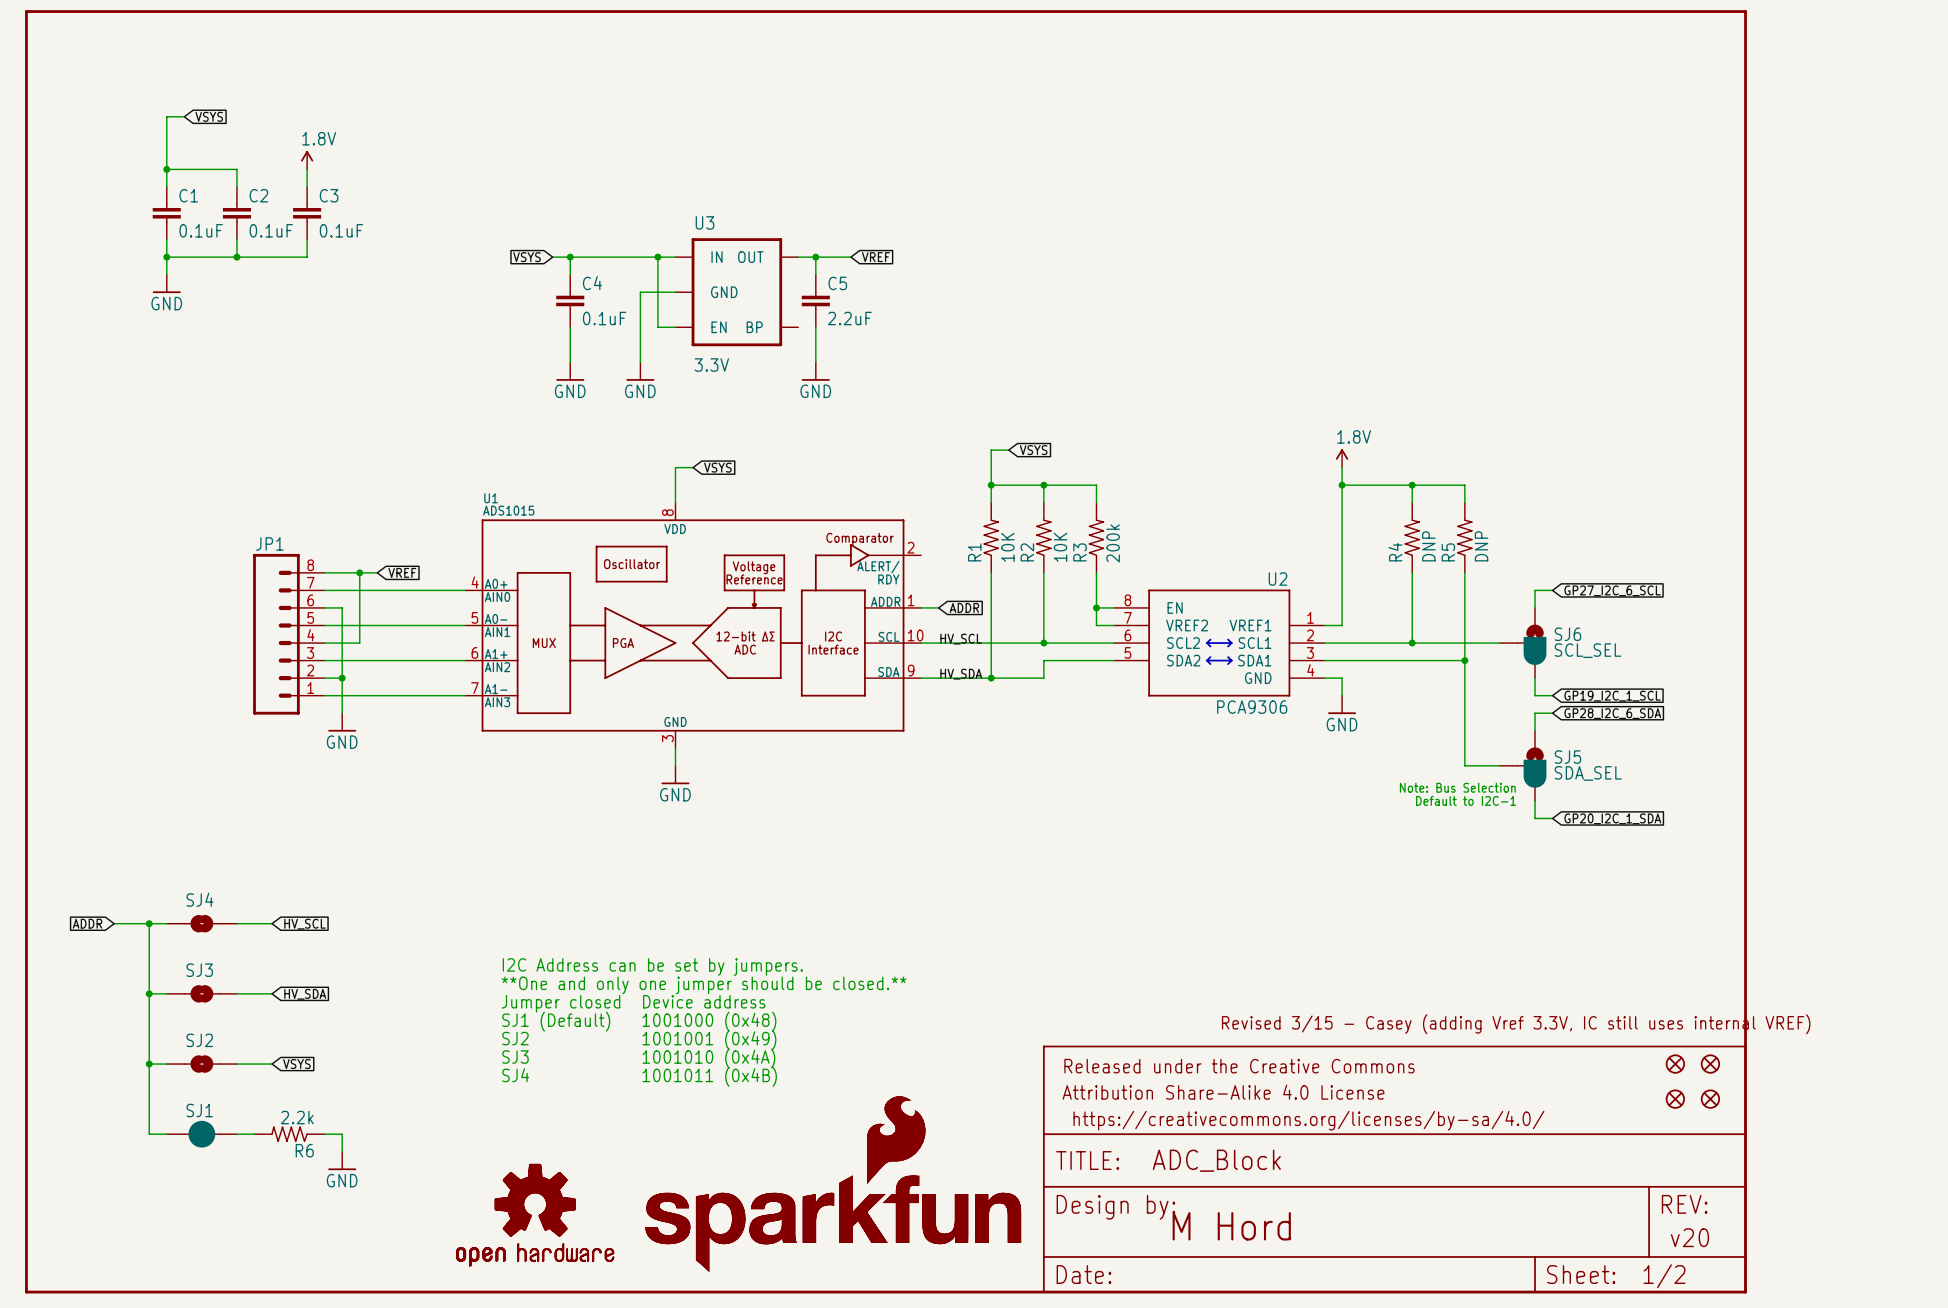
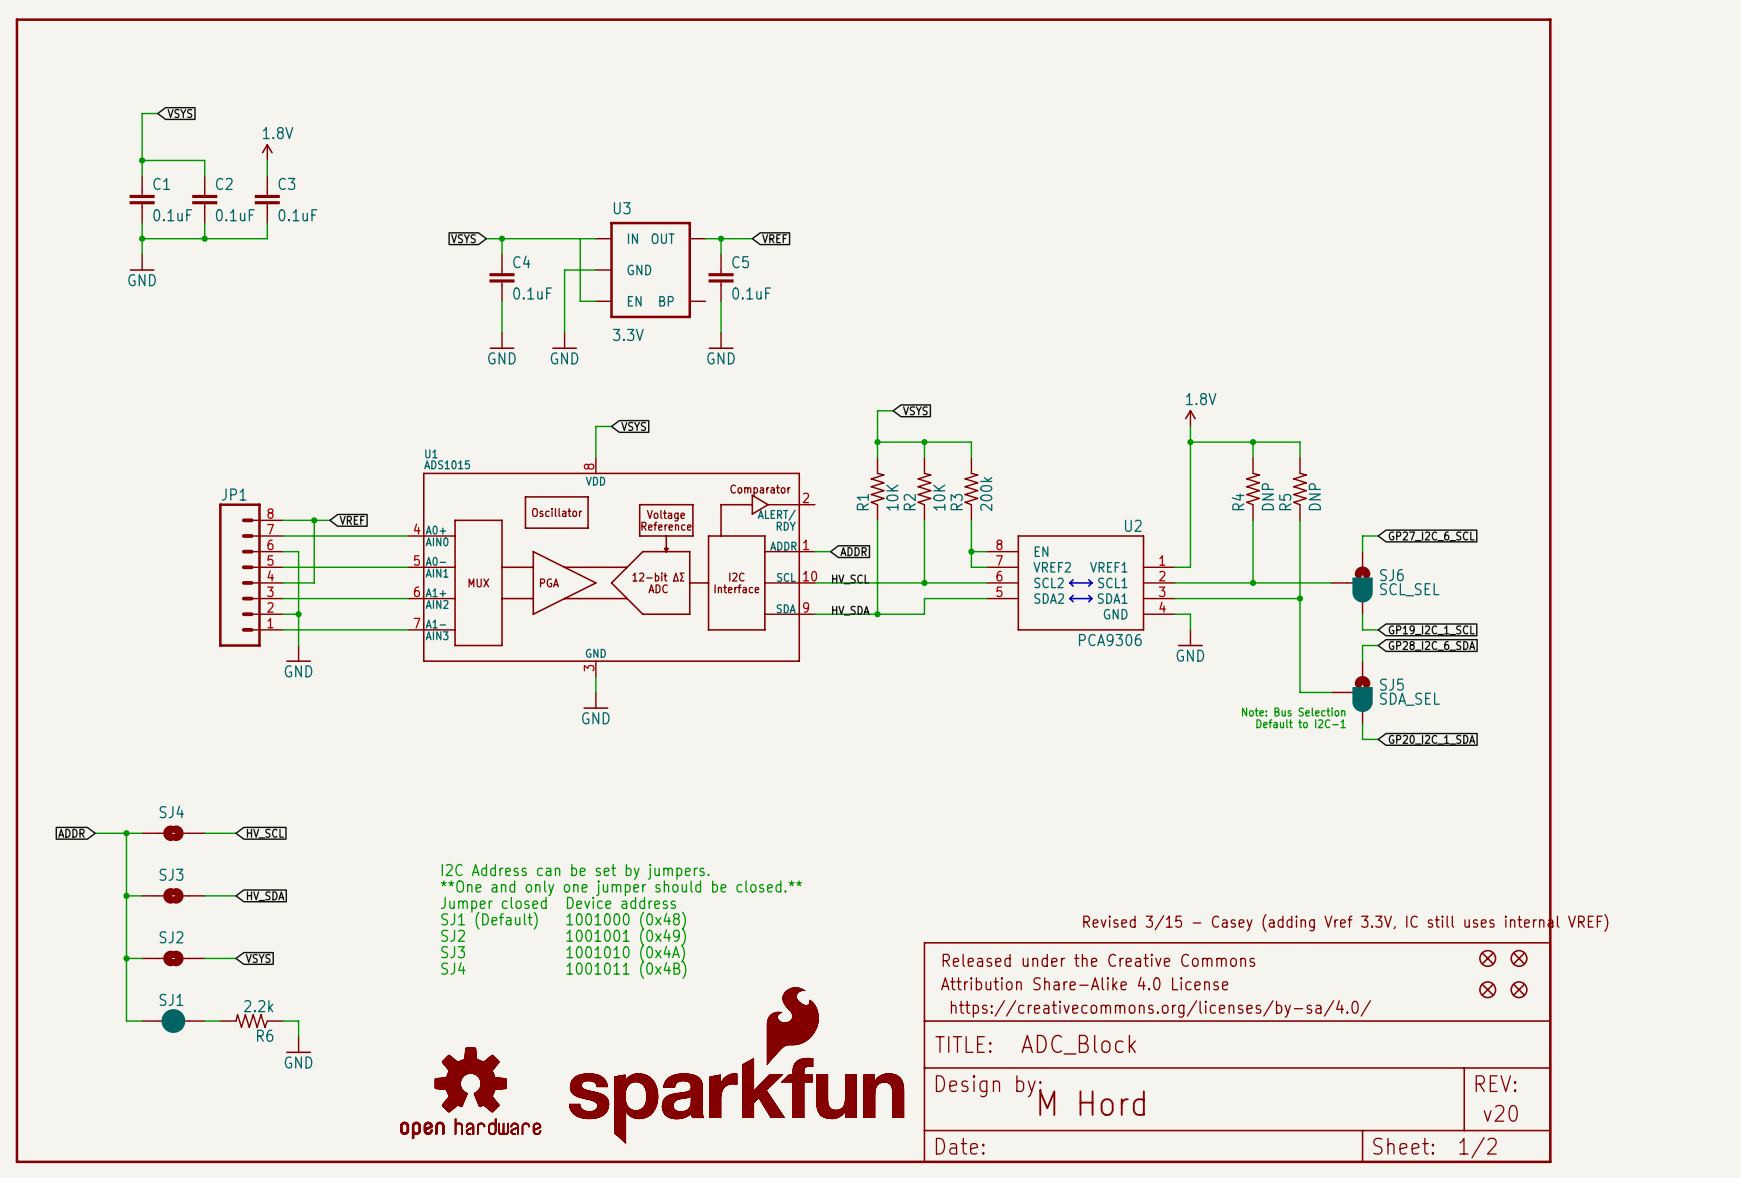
junction: (657, 257) -> none
C5 value: 2.2uF (849, 318) -> 0.1uF (751, 293)

